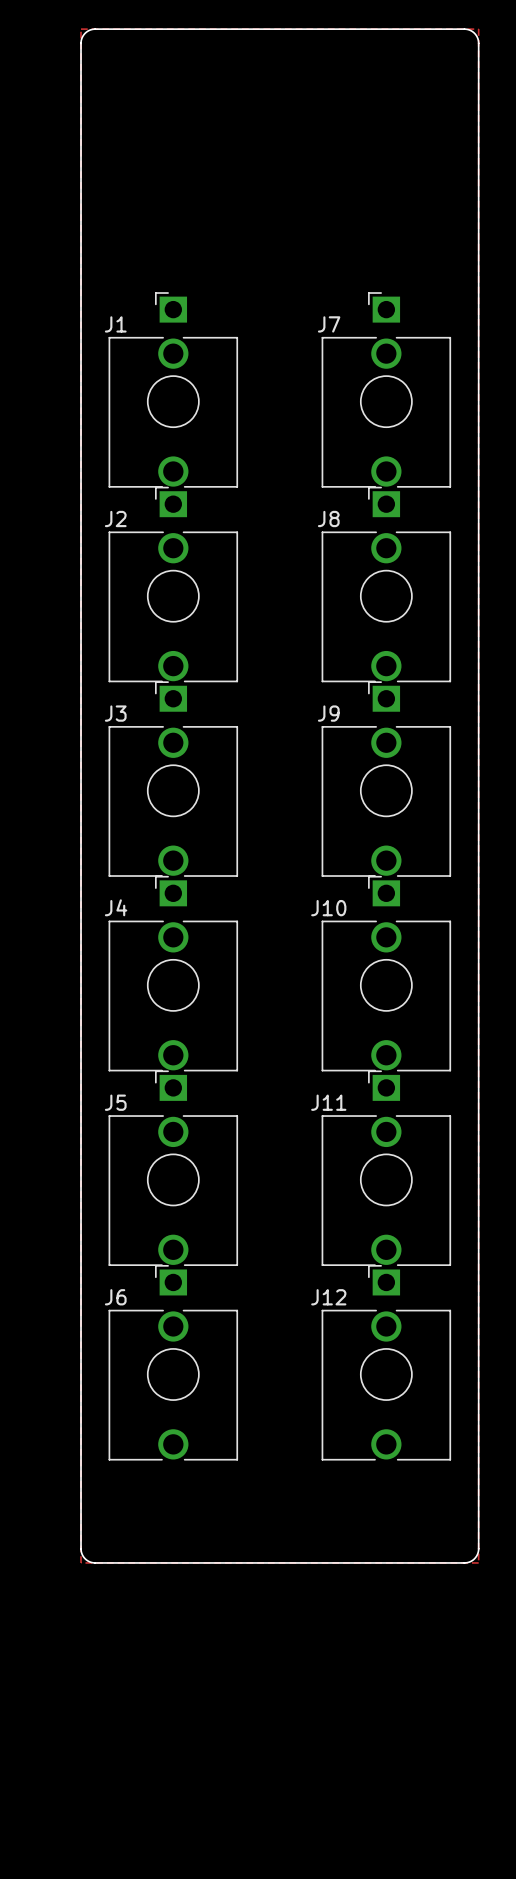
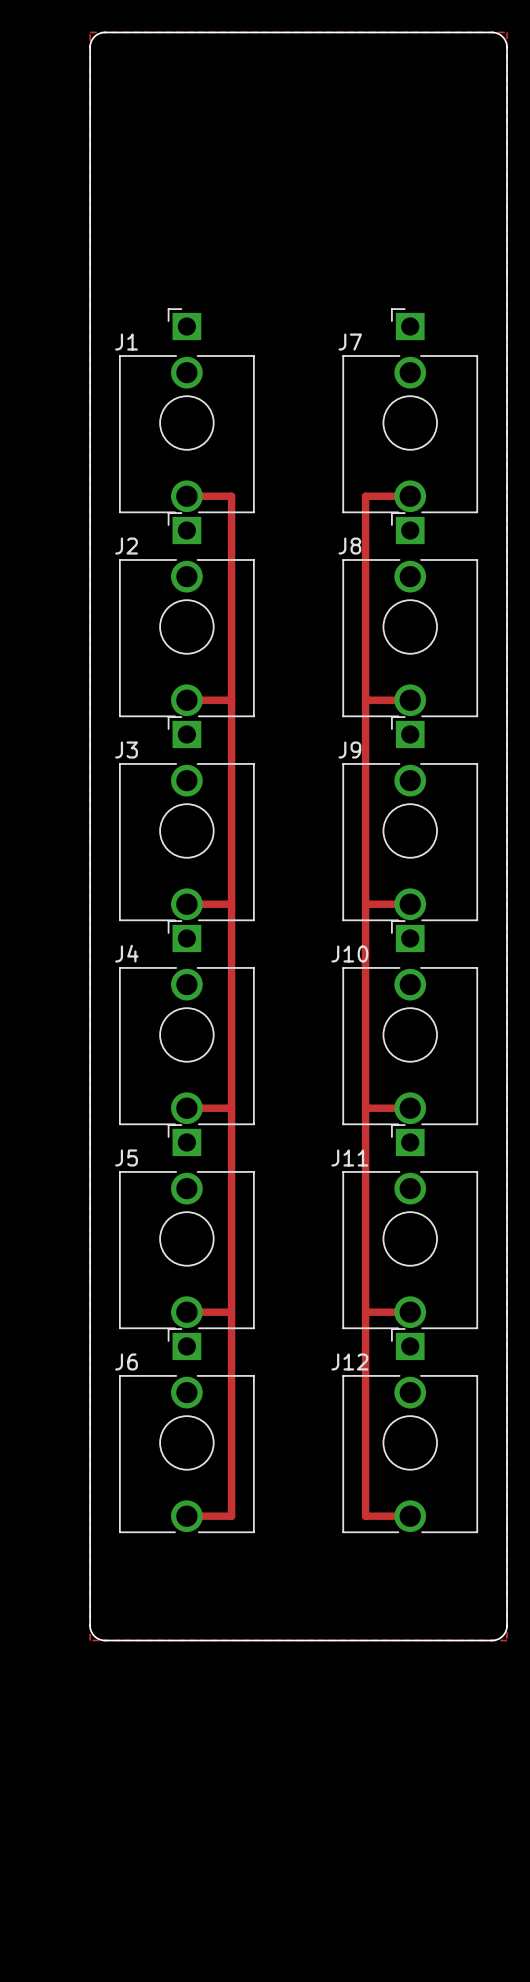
track: none -> (186, 496) (231, 496) (231, 1516) (186, 1516)
track: none -> (410, 496) (365, 496) (365, 1516) (410, 1516)
track: none -> (186, 700) (231, 700)
track: none -> (365, 700) (410, 700)
track: none -> (186, 904) (231, 904)
track: none -> (365, 904) (410, 904)
track: none -> (186, 1108) (231, 1108)
track: none -> (365, 1108) (410, 1108)
track: none -> (186, 1312) (231, 1312)
track: none -> (365, 1312) (410, 1312)

